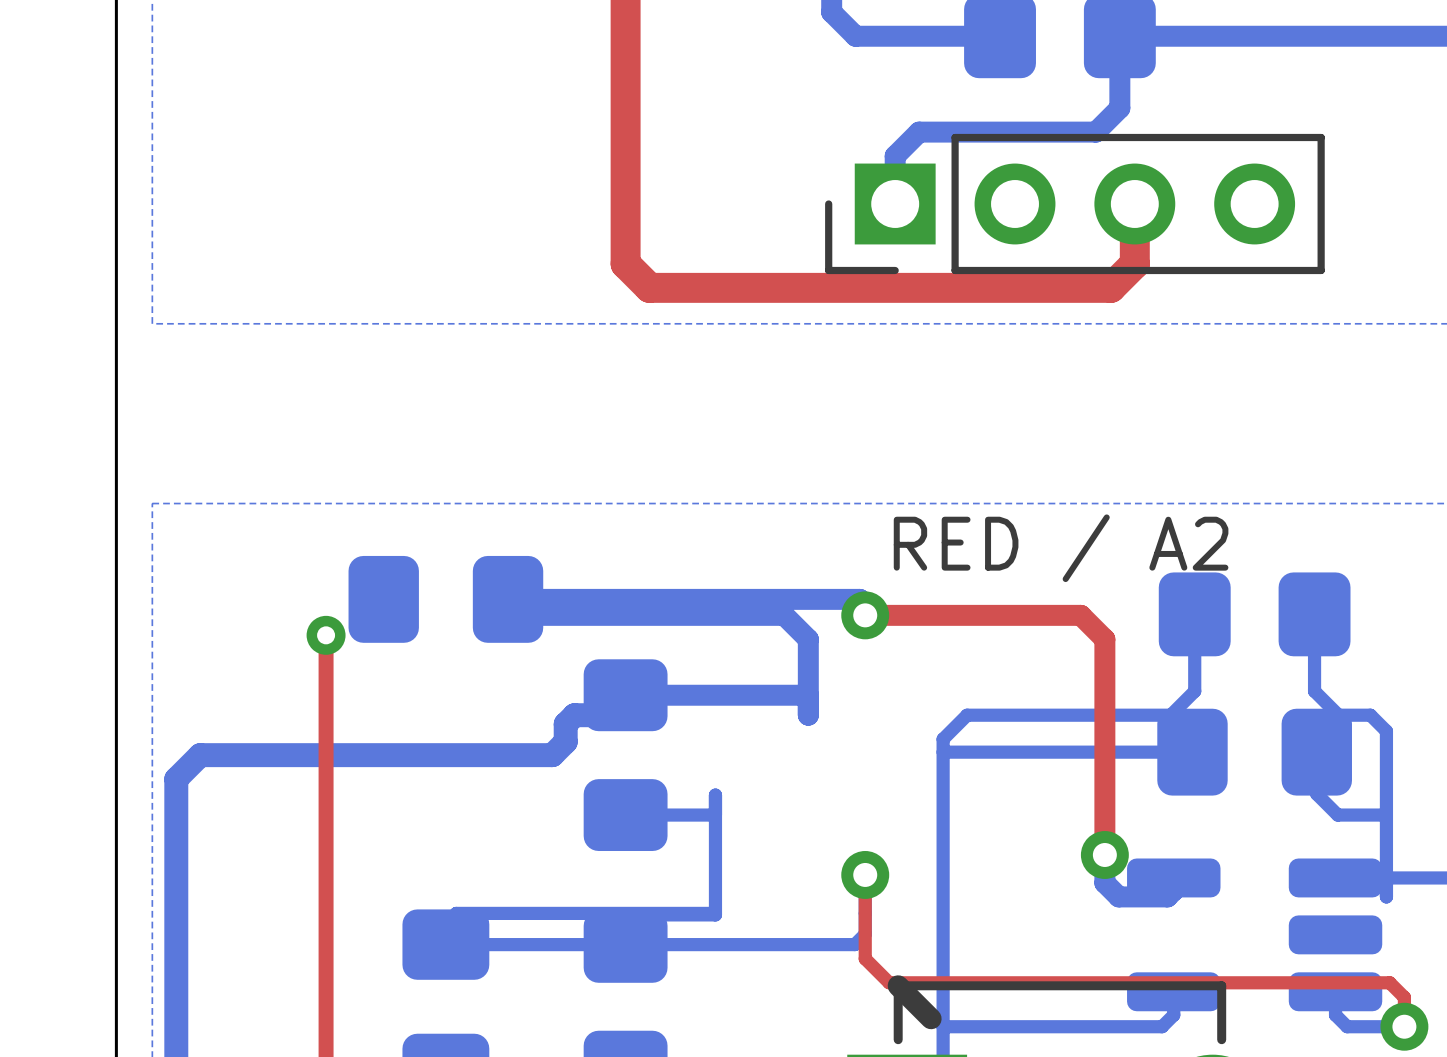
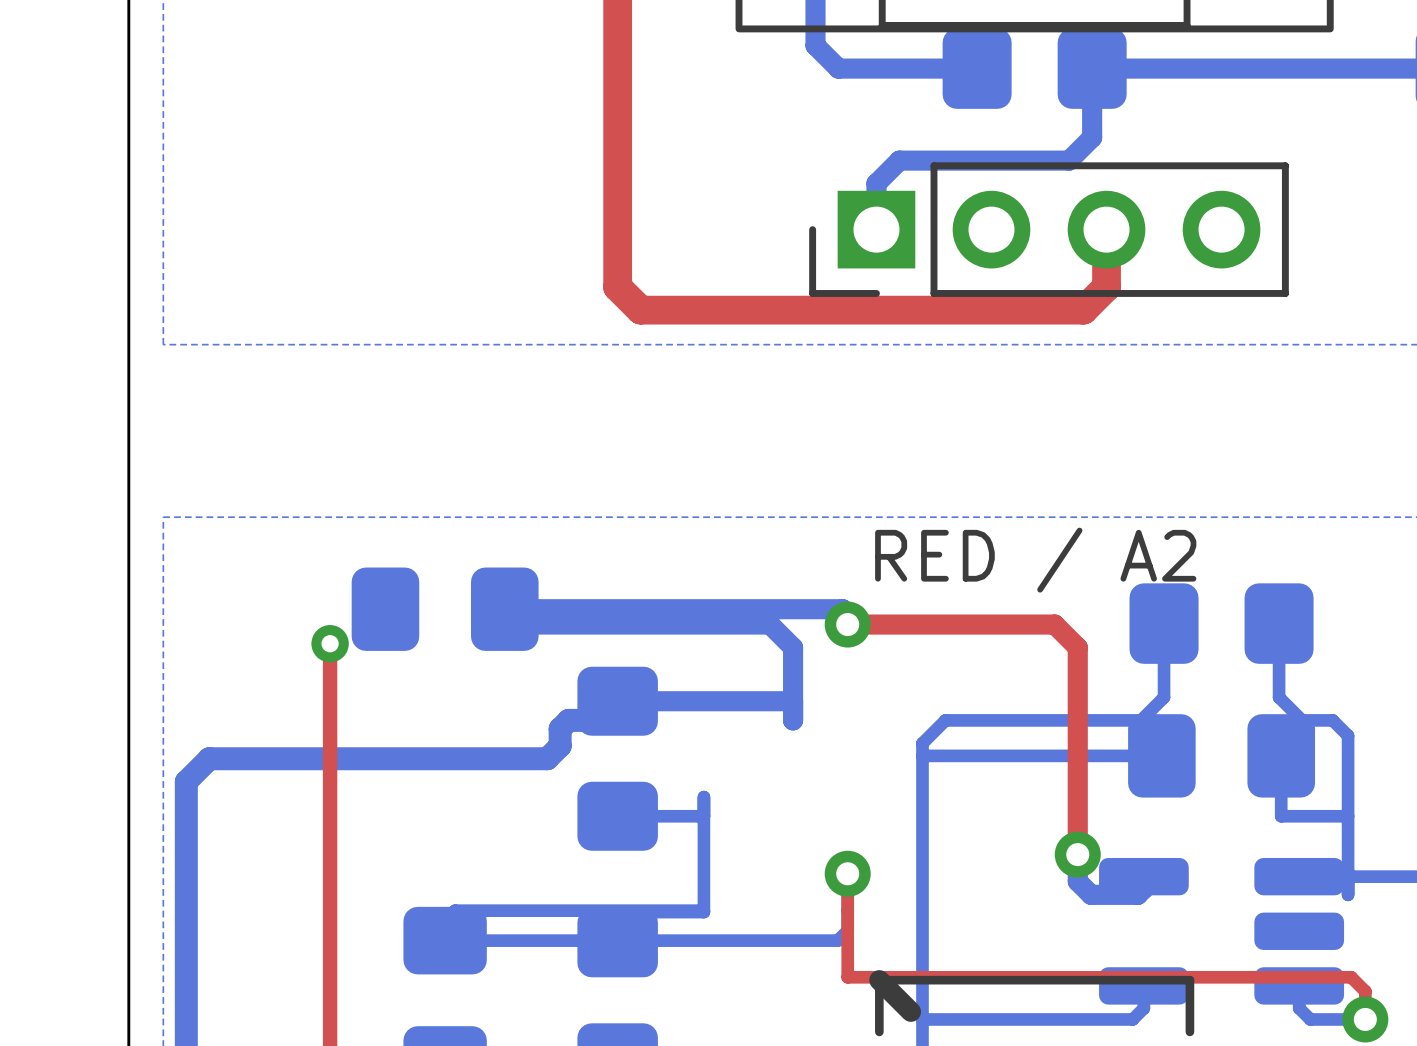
bottom track: (1316, 794) (1337, 815) -> (1281, 796) (1281, 816) (1301, 816)
top track: (865, 958) (889, 982) -> (847, 954) (847, 977) (870, 977)

